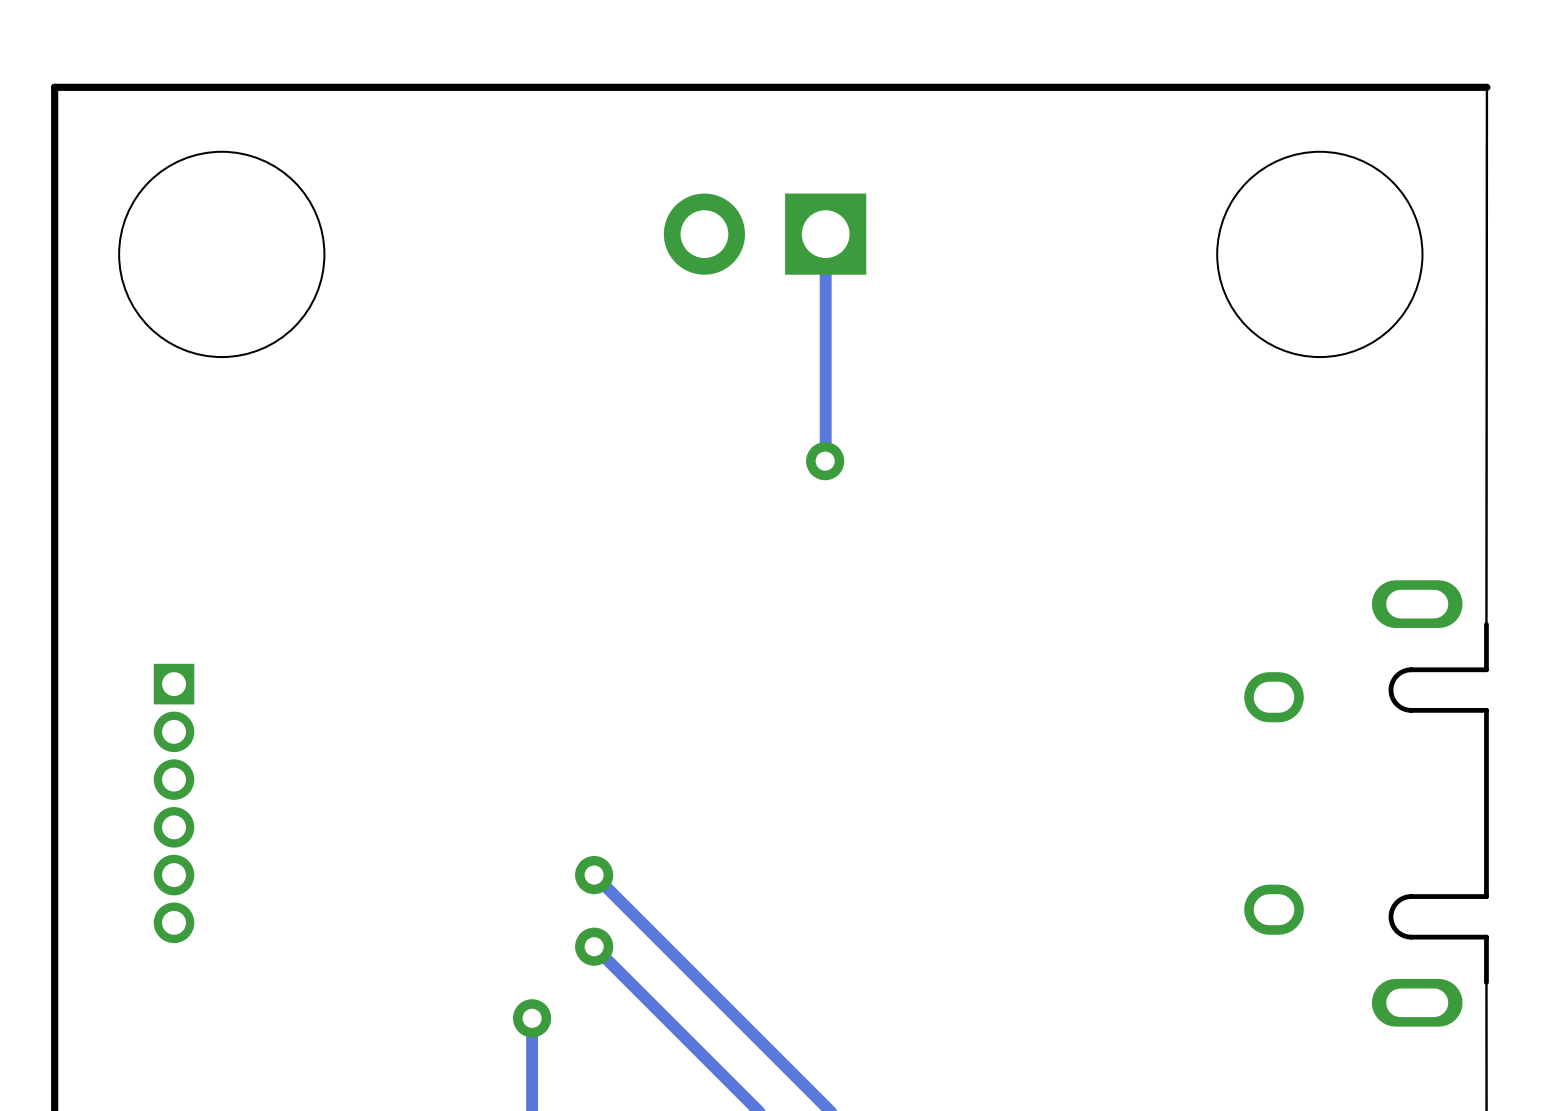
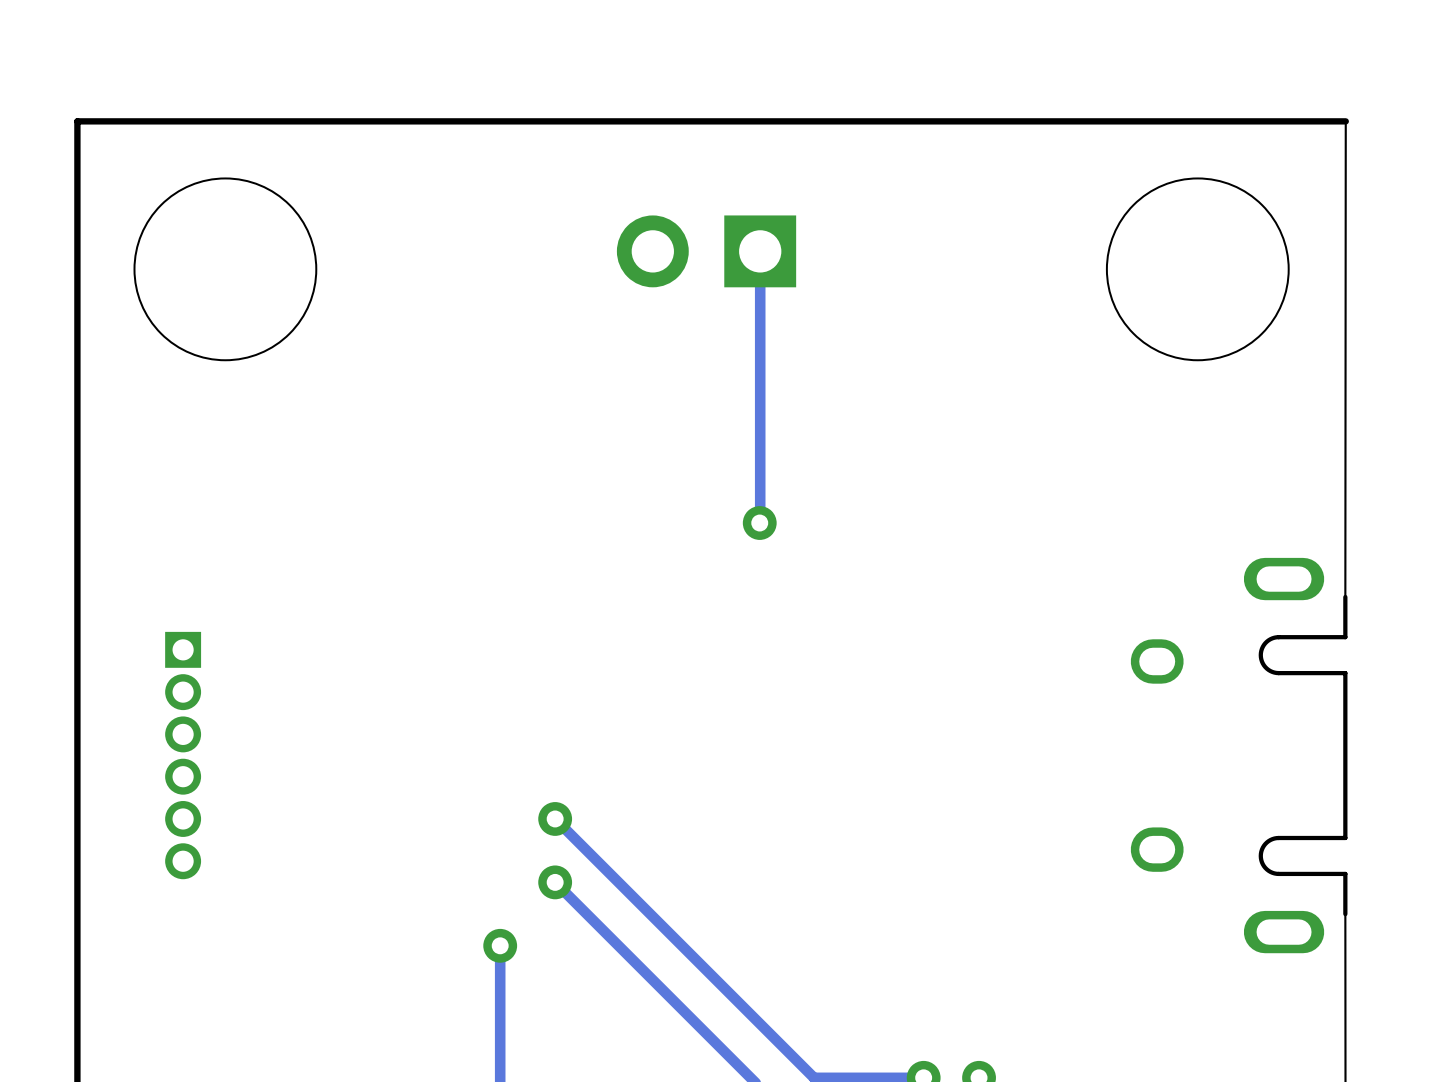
track: none -> (760, 451) (760, 522)
via position: (825, 461) -> (759, 523)

